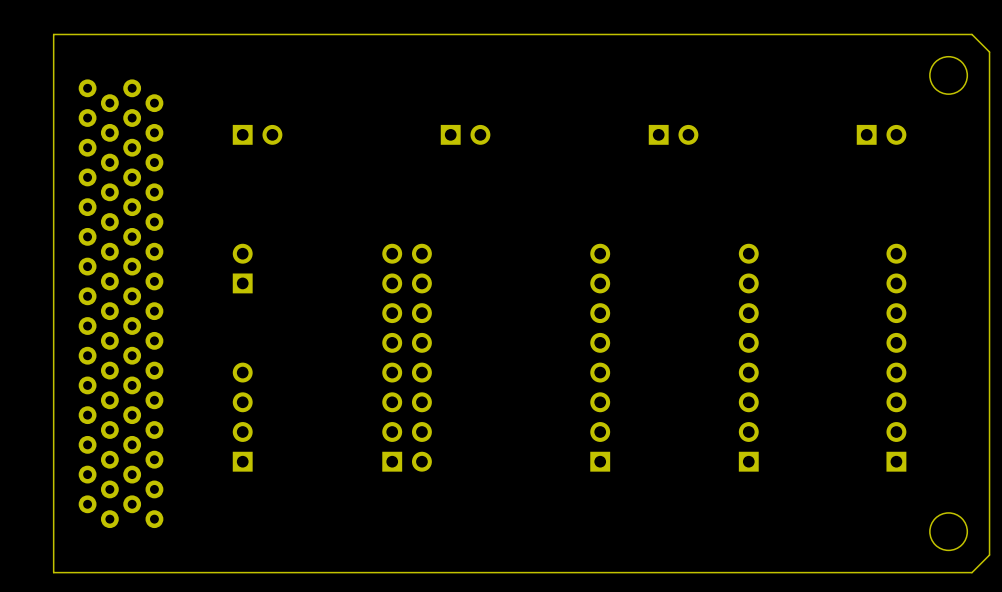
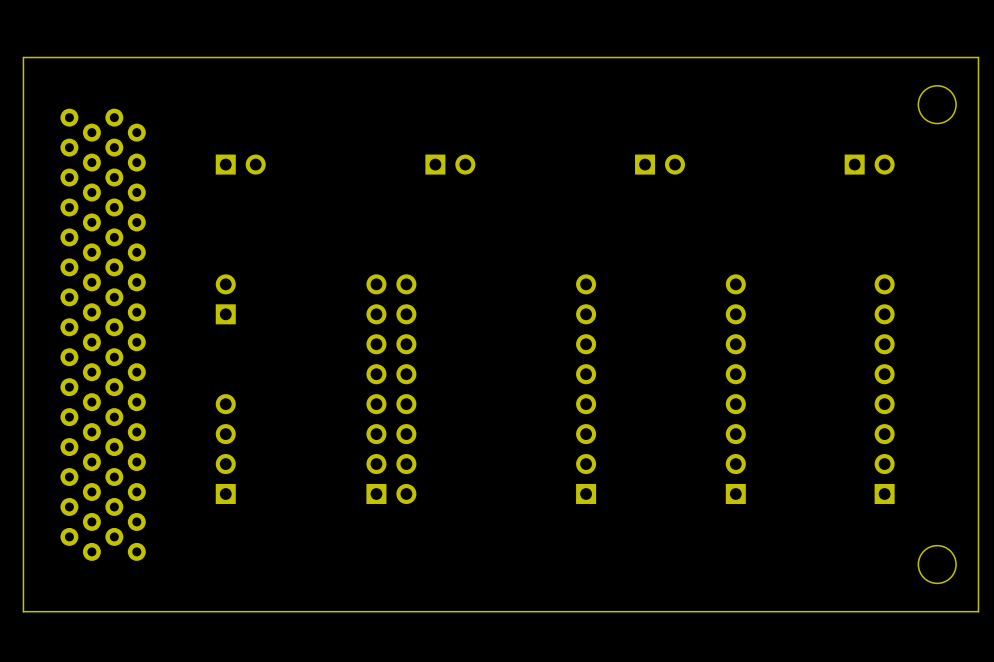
board edge: (989, 52) (971, 34) (53, 34) (53, 572) (971, 572) (989, 555) -> (978, 81) (978, 57) (23, 57) (23, 611)
board edge: none -> (978, 588) (978, 611) (23, 611)

